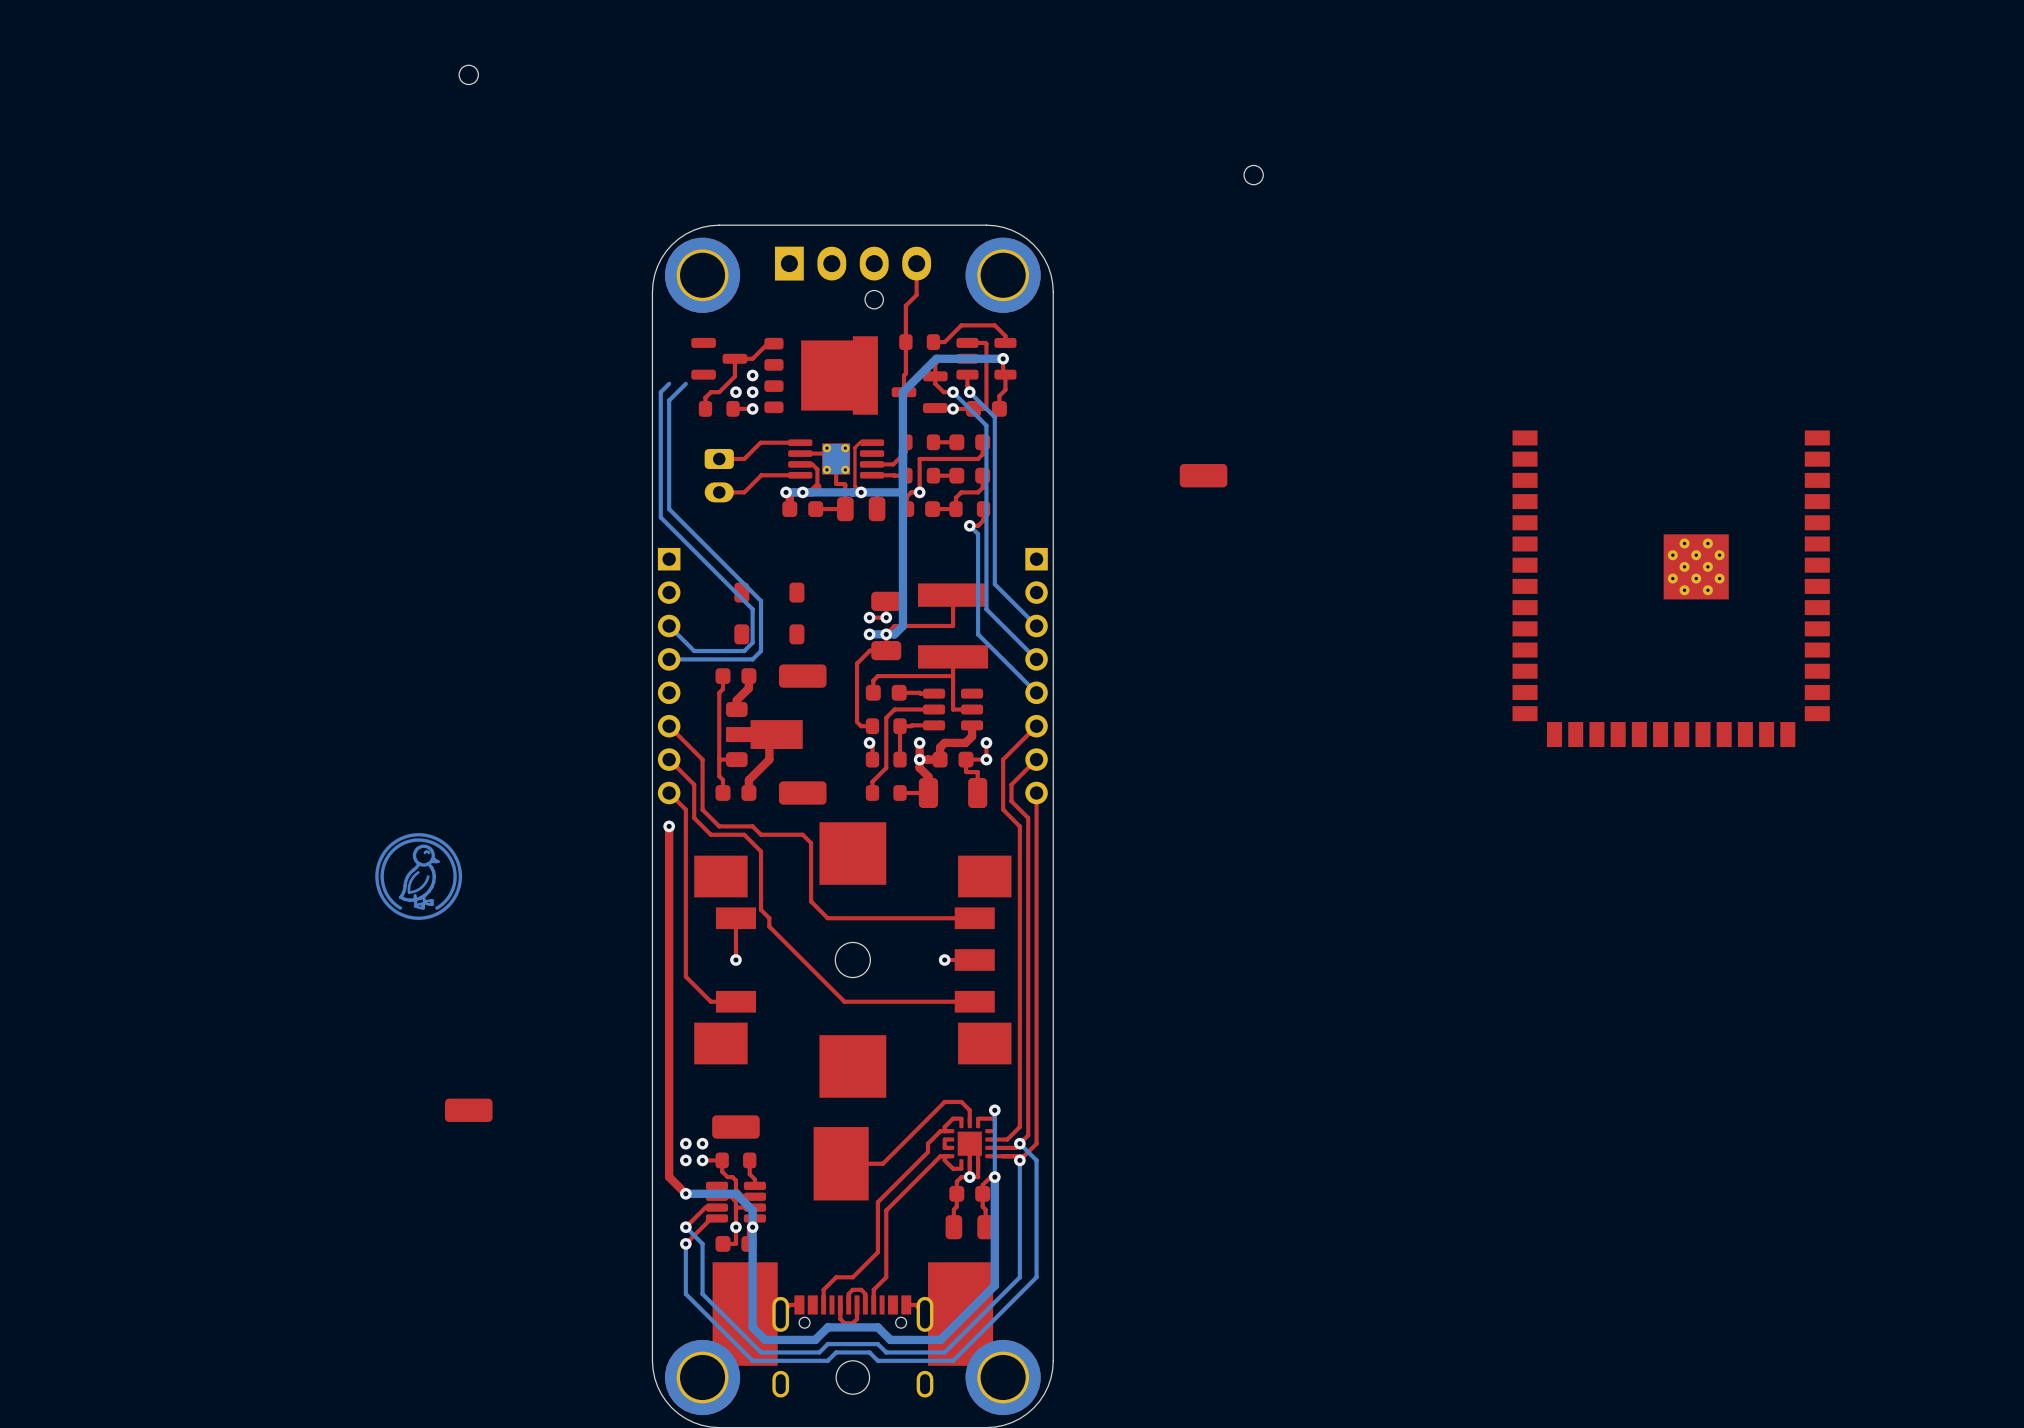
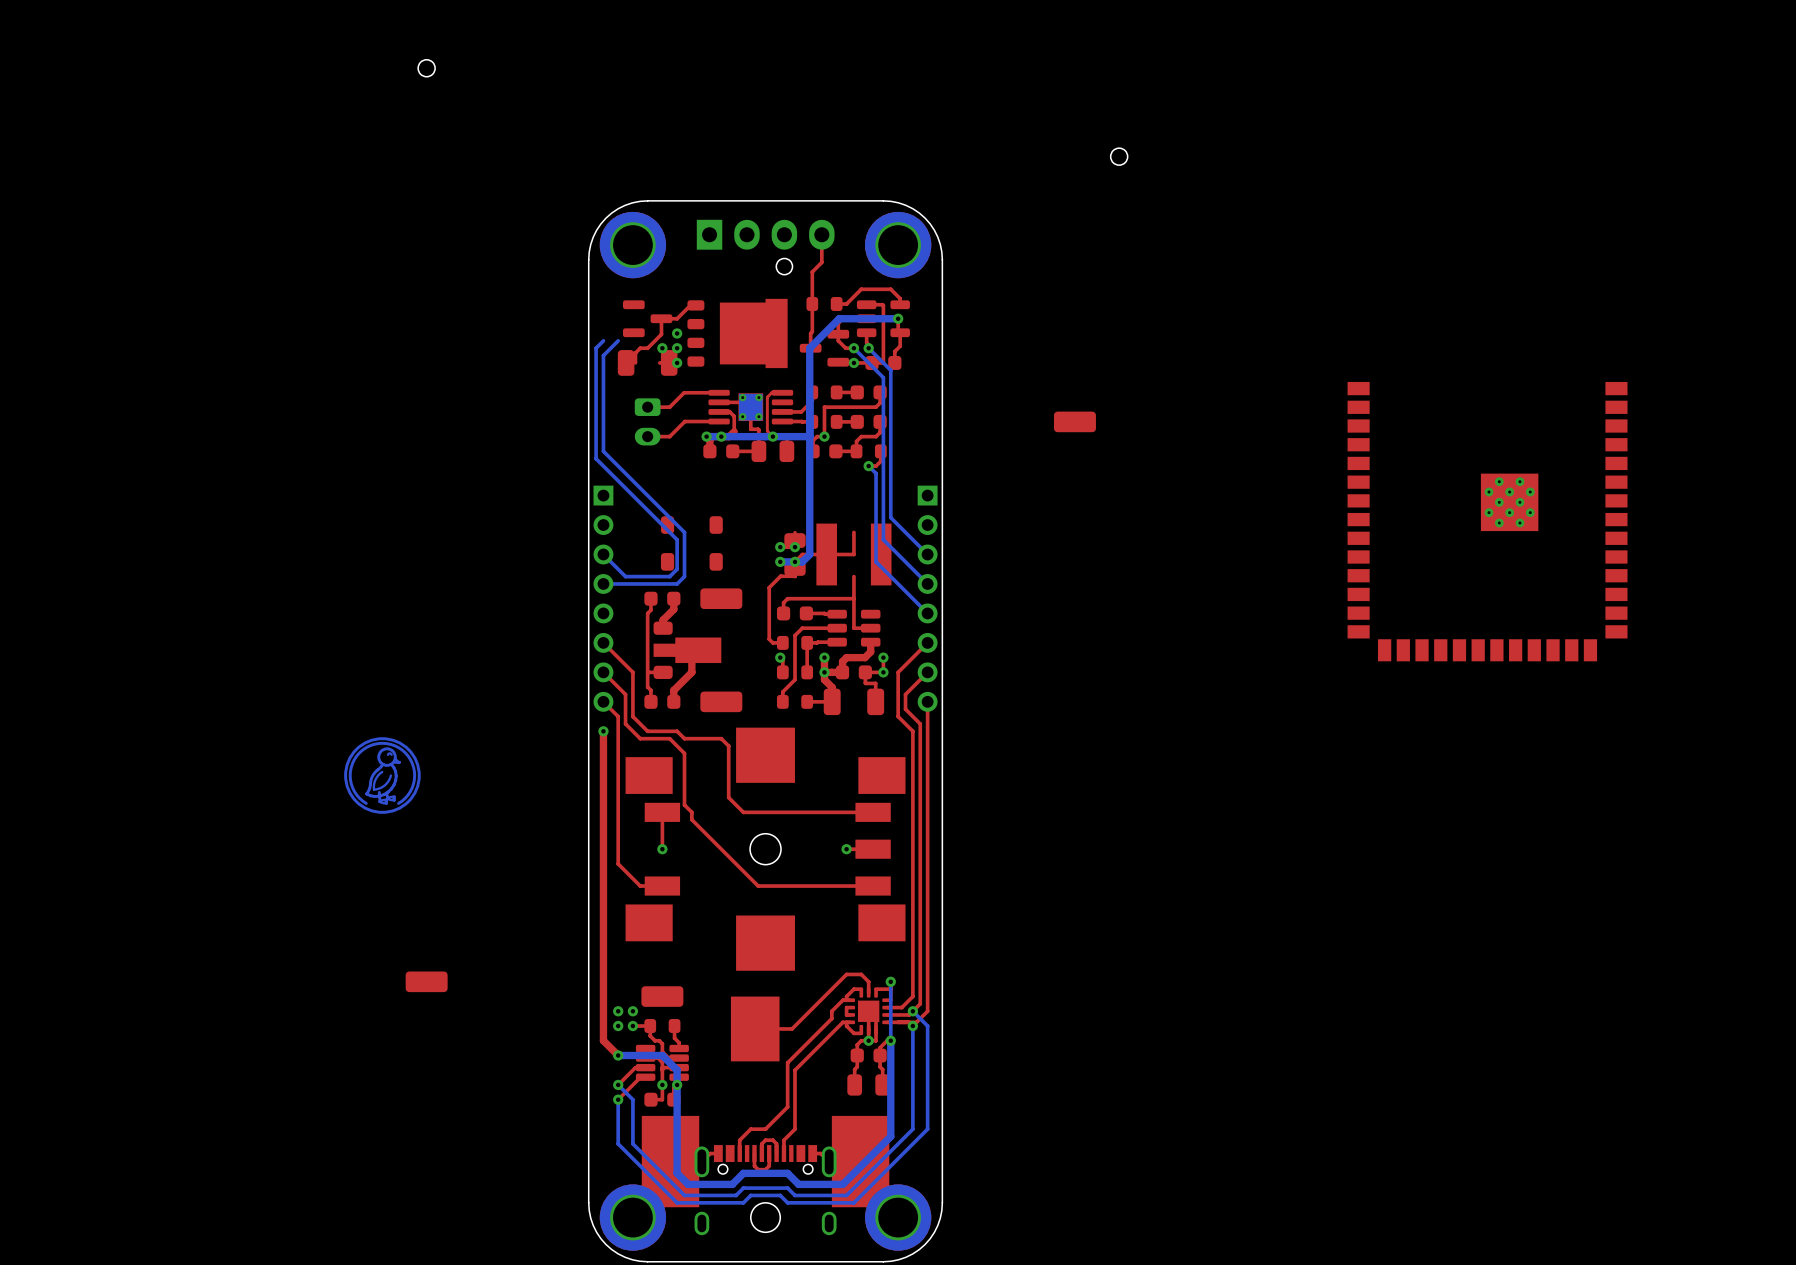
part footprint: [698, 400, 740, 417] -> [617, 350, 678, 376]
part footprint: [871, 591, 902, 661] -> [784, 533, 806, 576]
part rotation: 0° (953, 625) -> 90° clockwise (853, 554)

